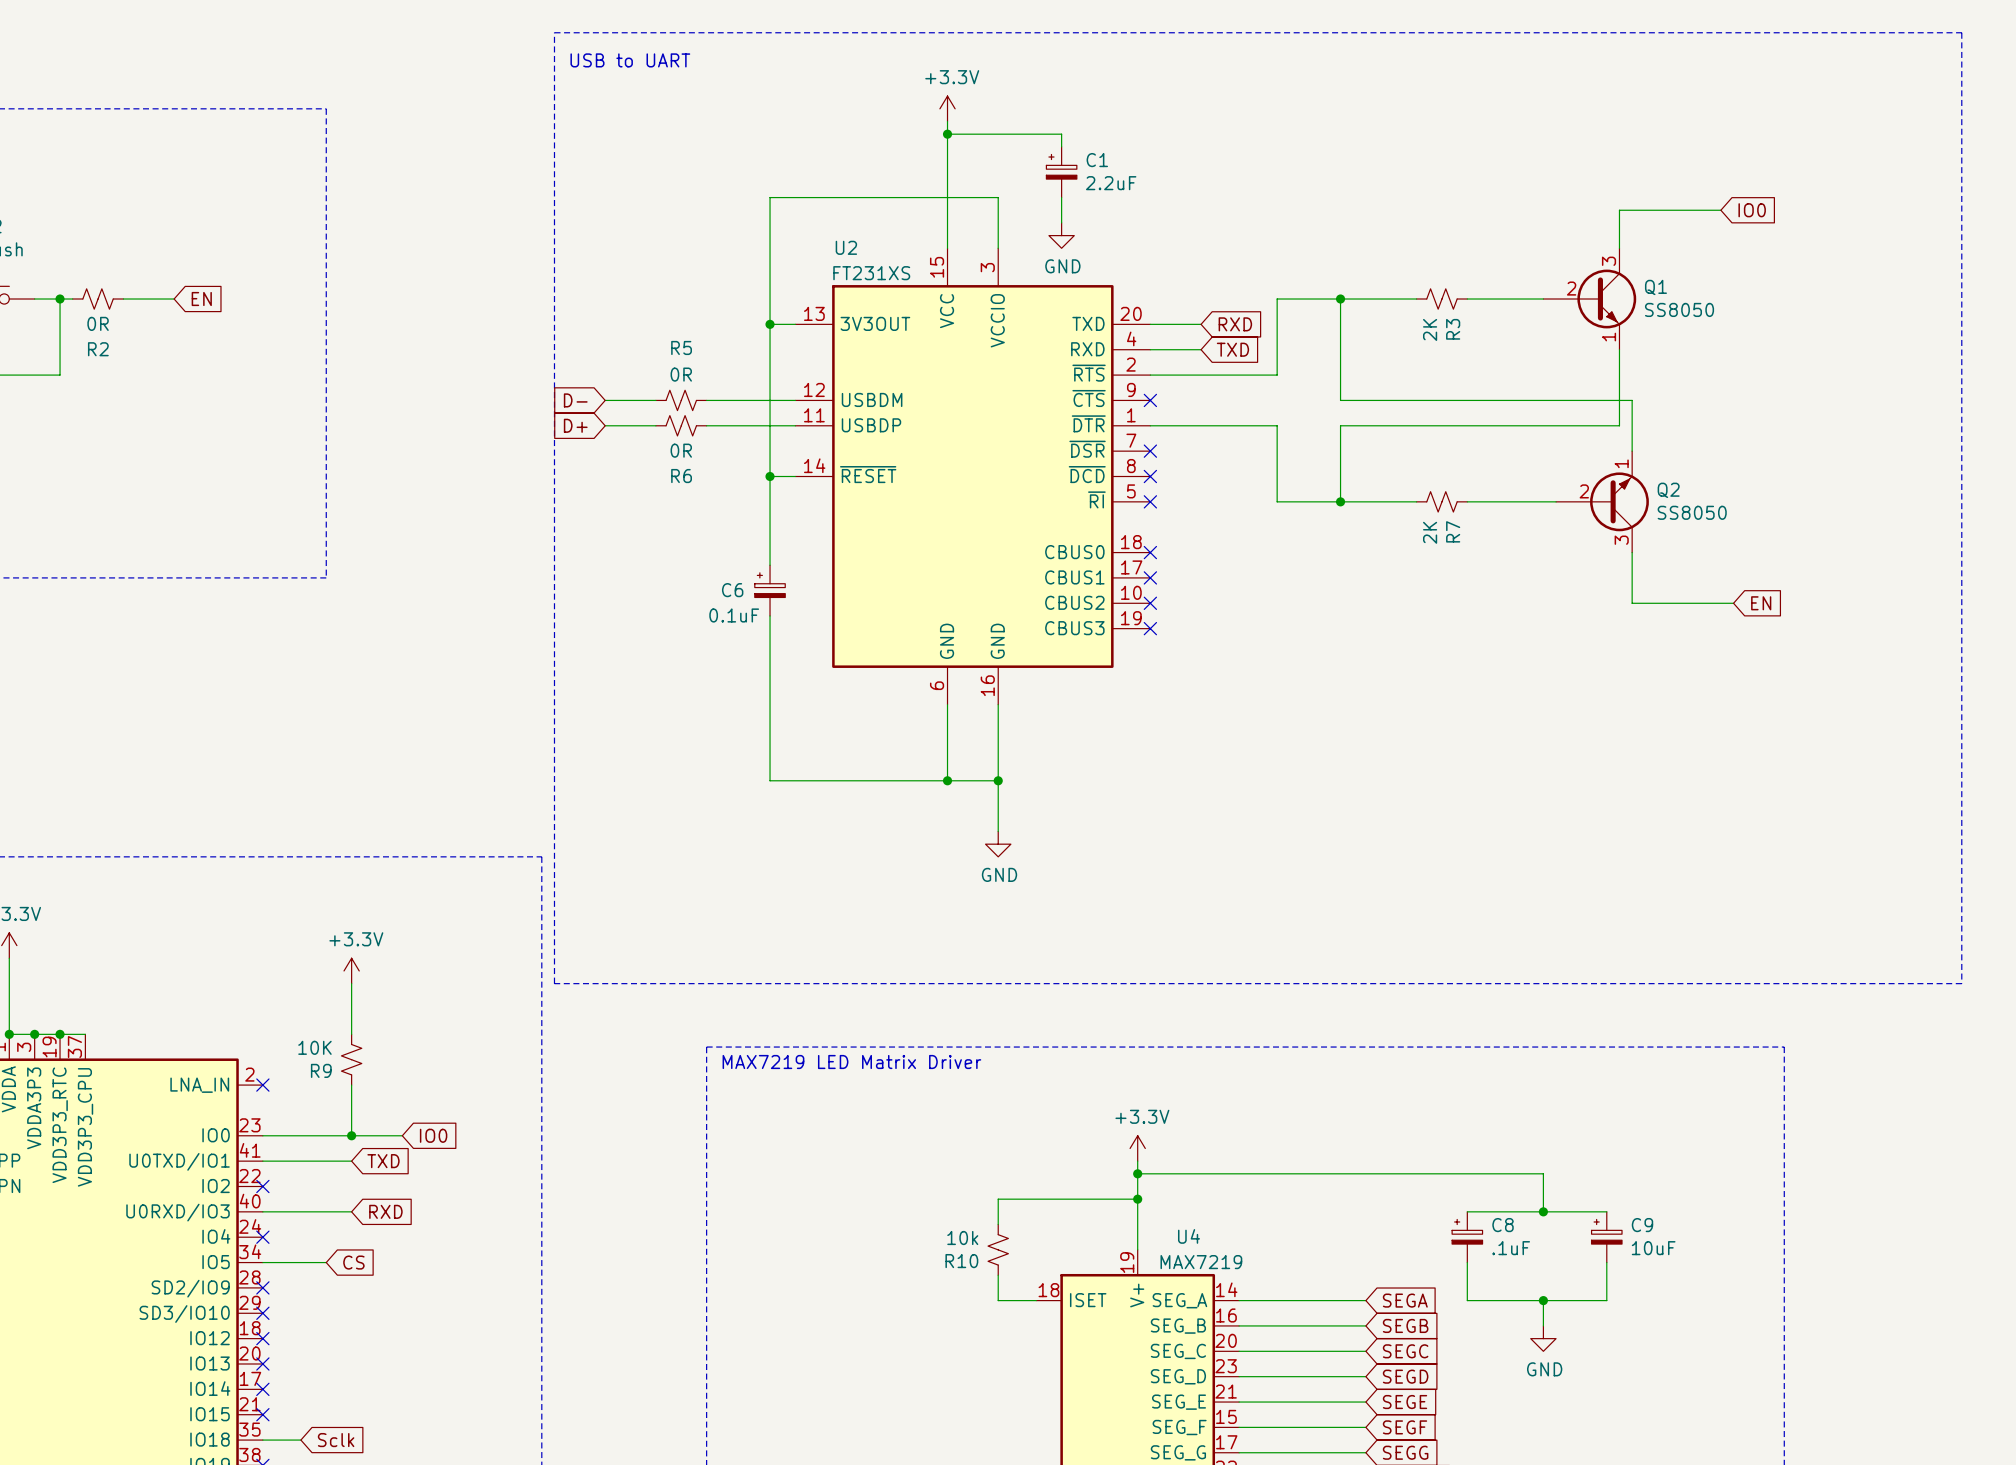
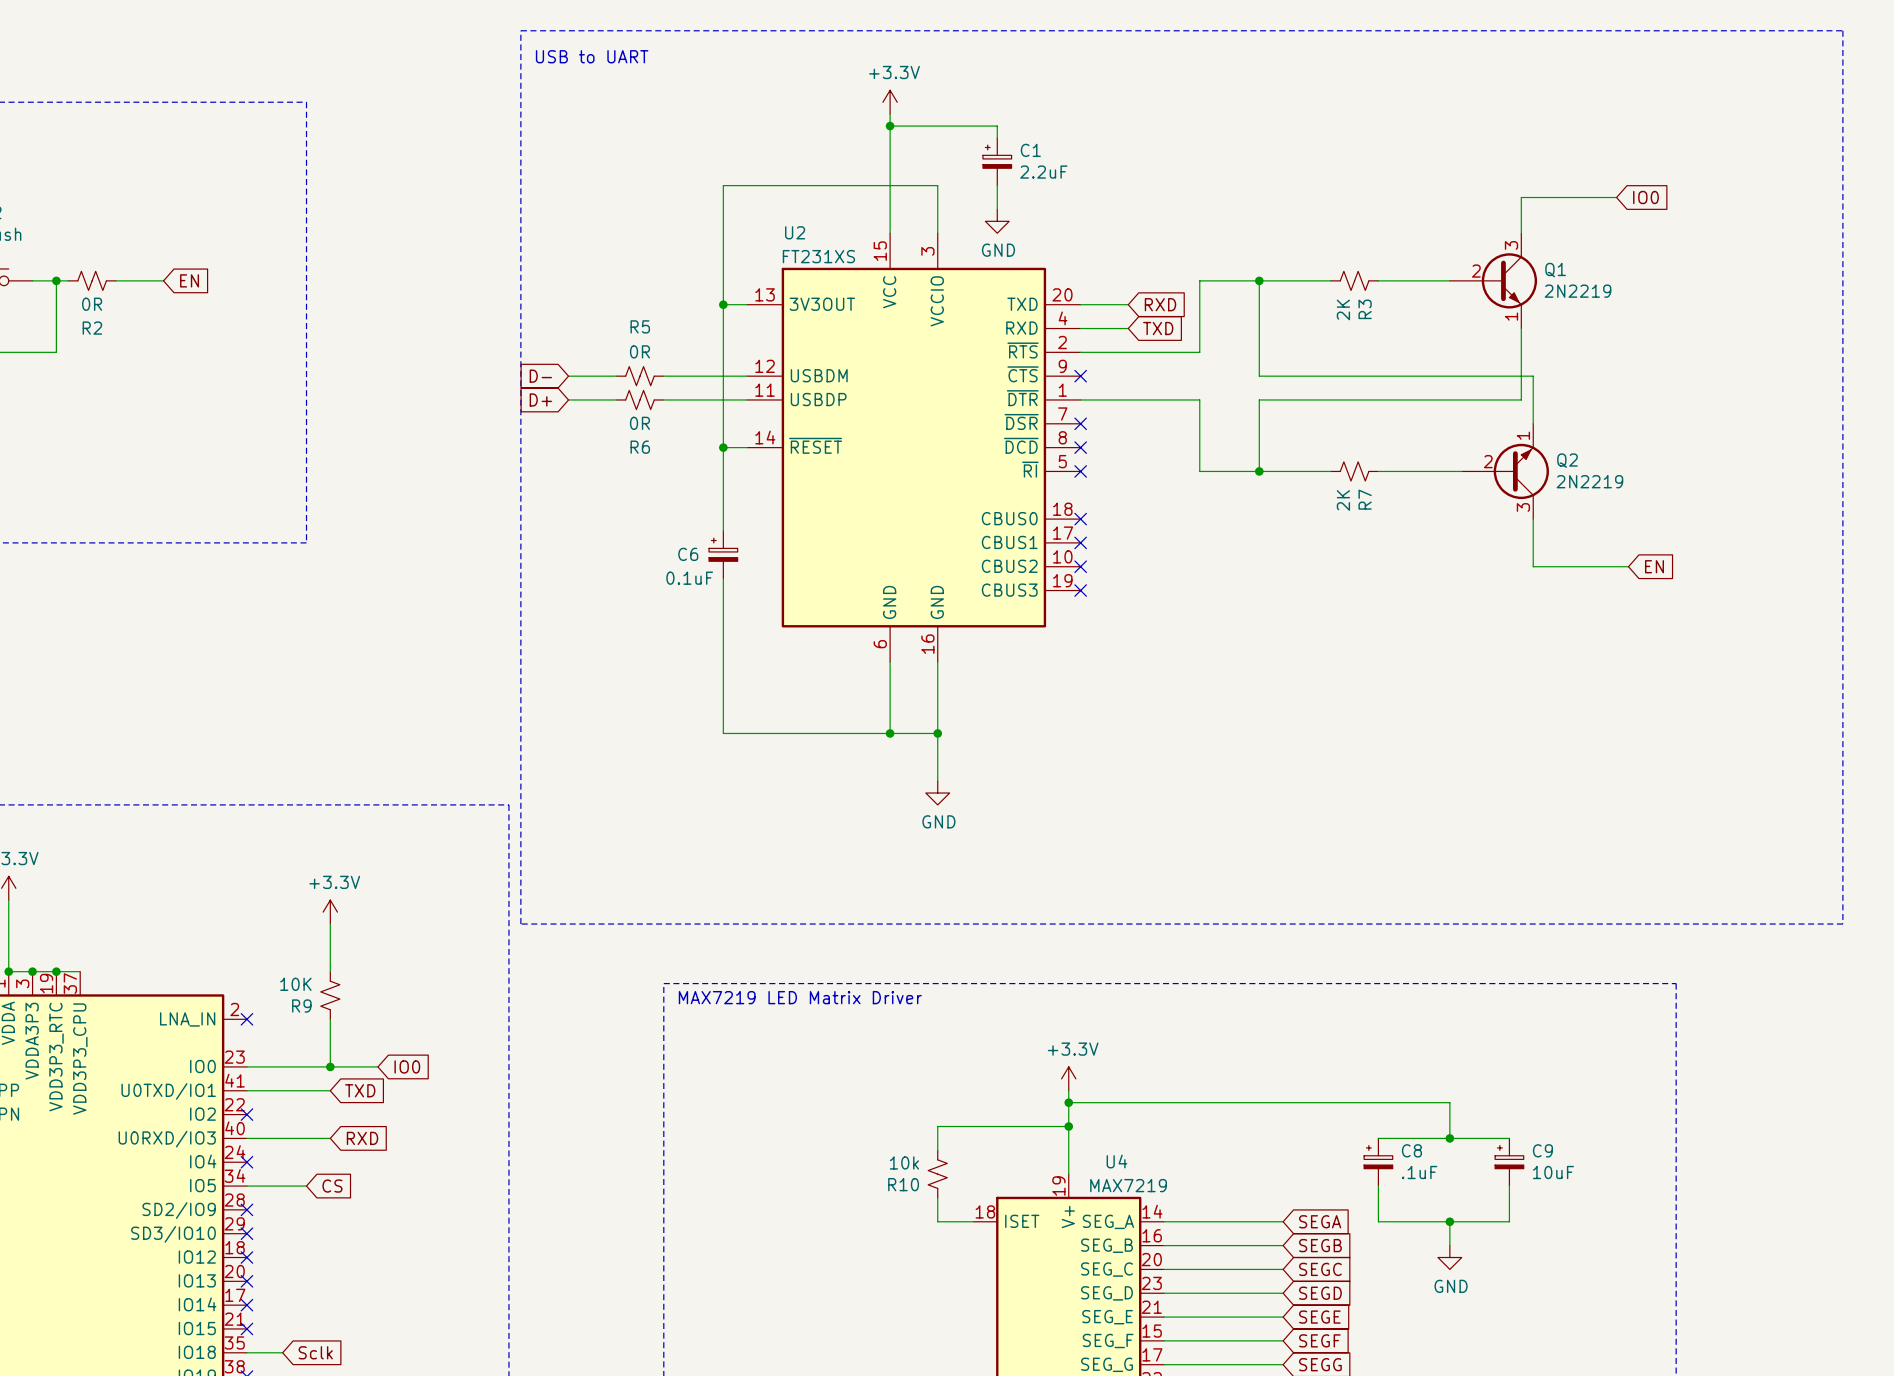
Q1 value: SS8050 (1679, 309) -> 2N2219 (1578, 291)
Q2 value: SS8050 (1692, 512) -> 2N2219 (1589, 481)

